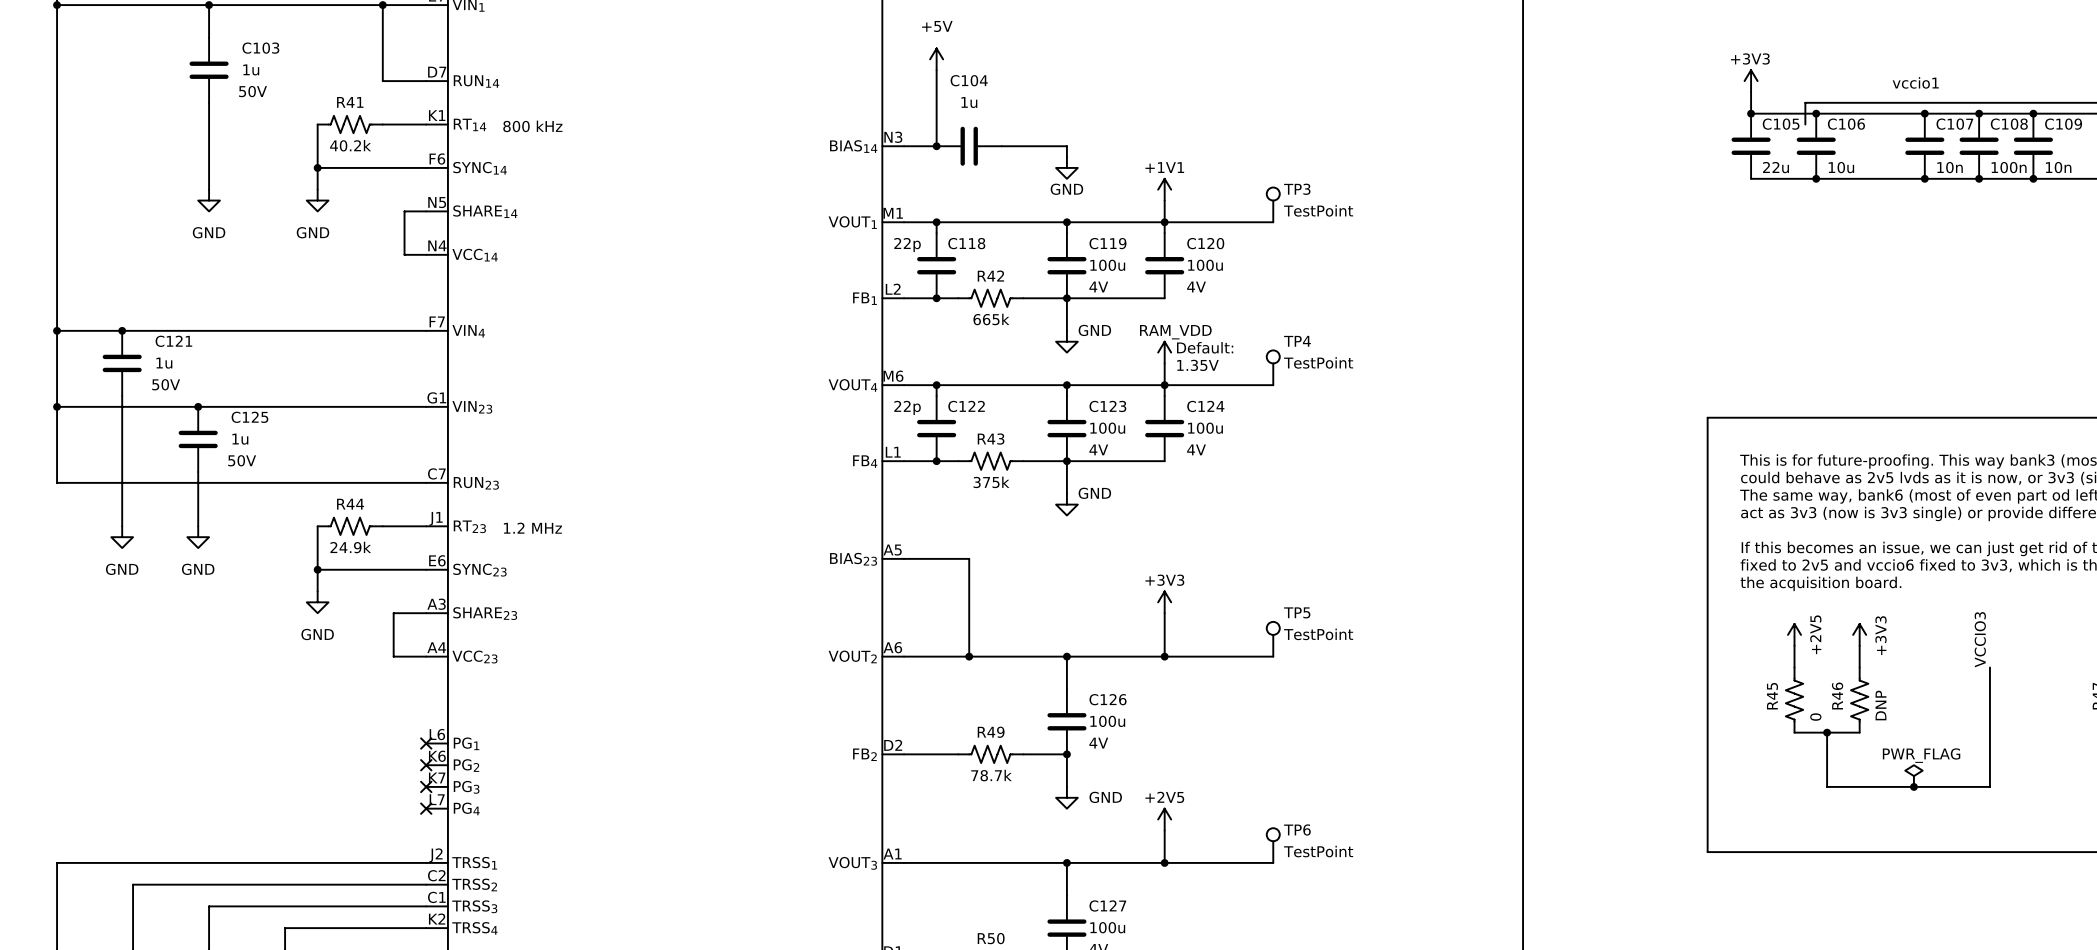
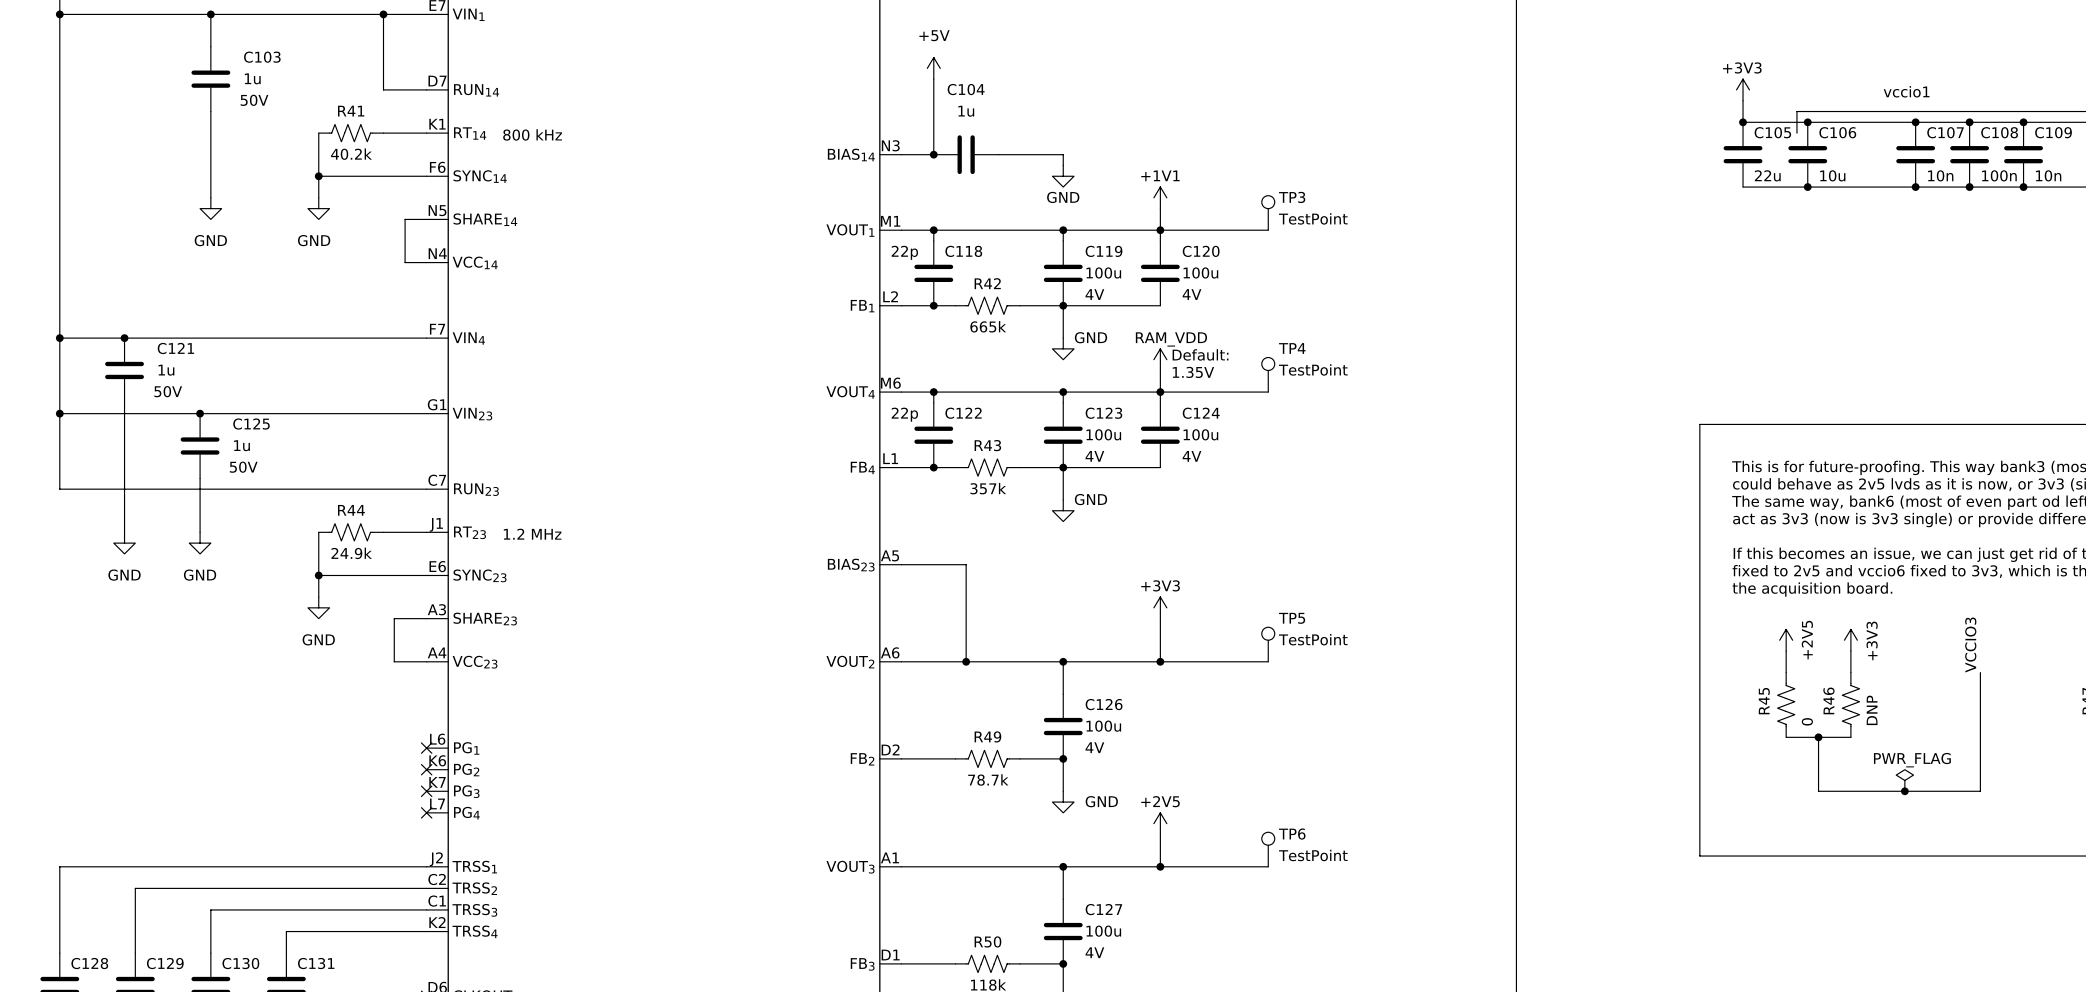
R43 value: 375k (991, 482) -> 357k (988, 488)

